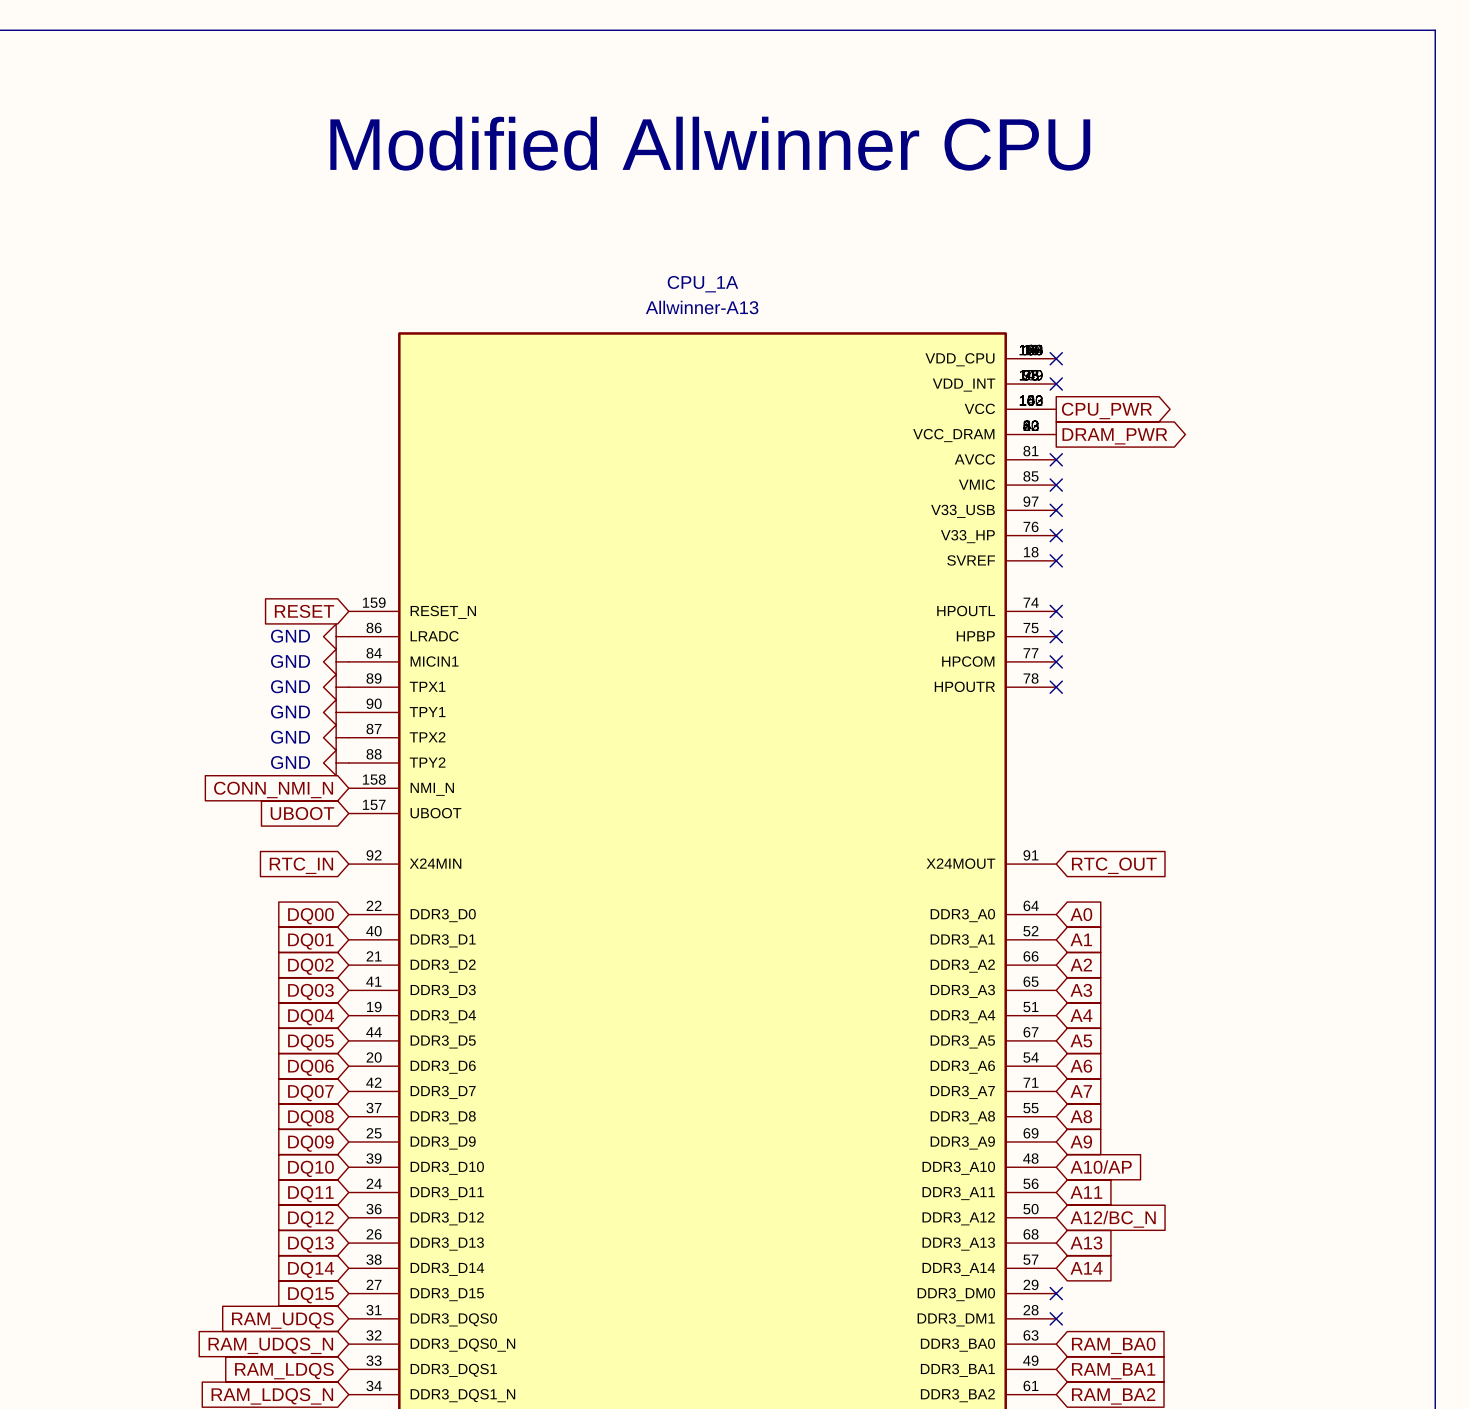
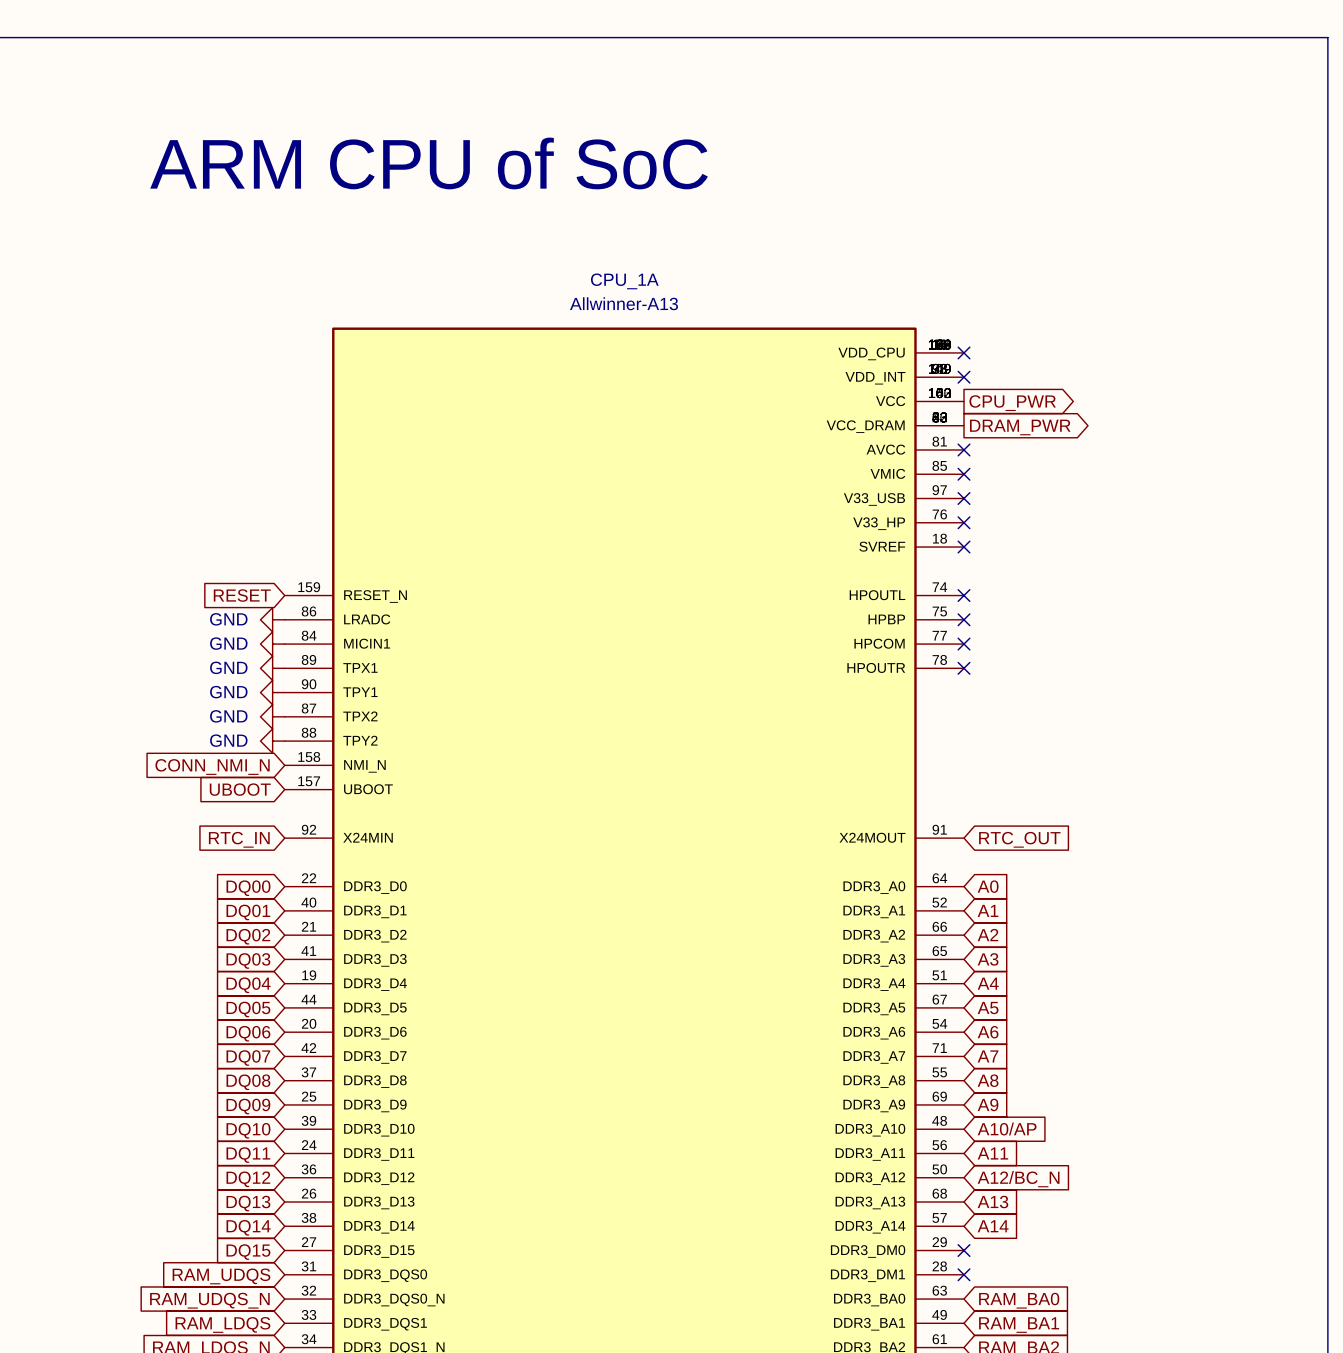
text: Modified Allwinner CPU (710, 143) -> none
text: none -> ARM CPU of SoC (429, 163)

